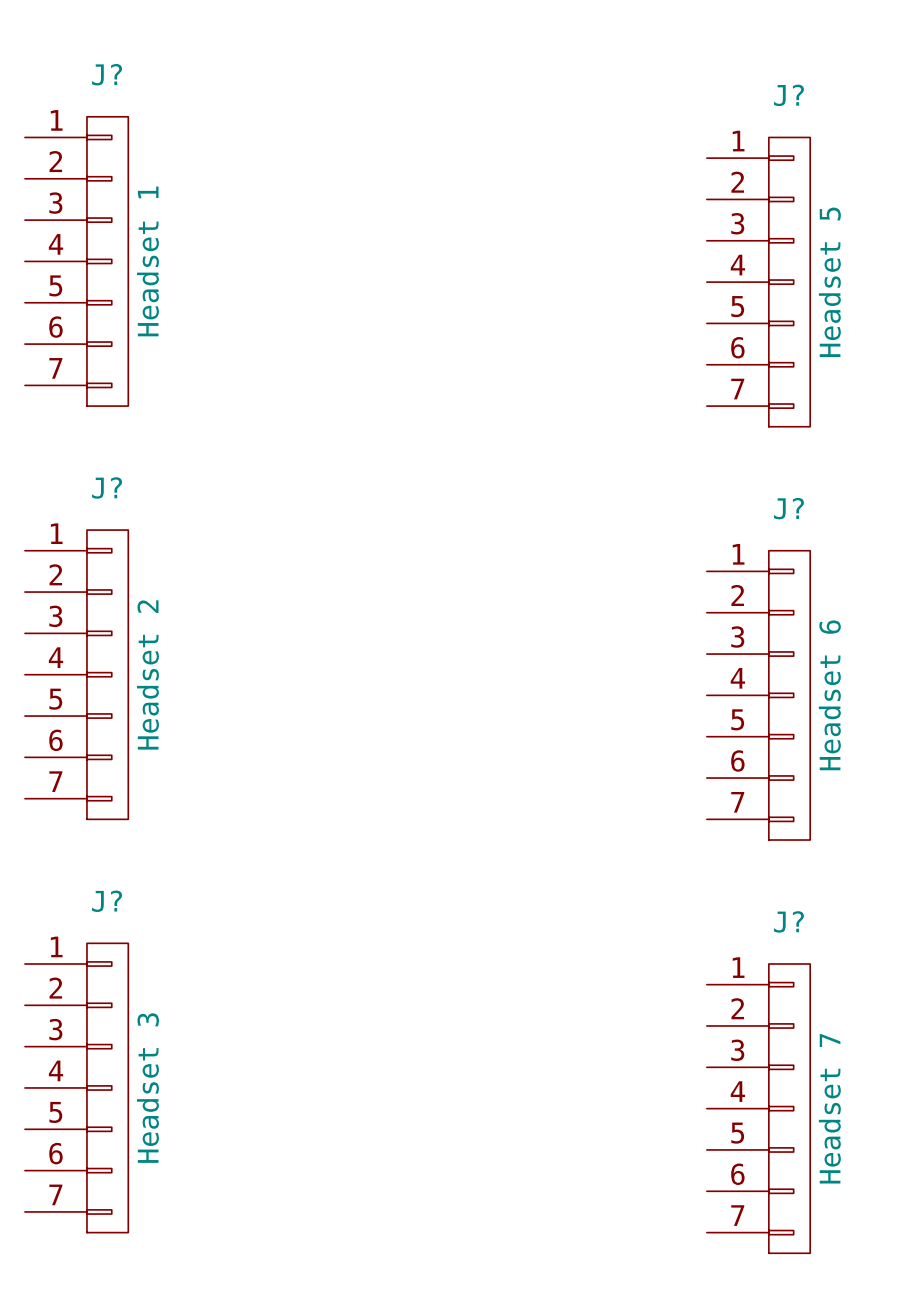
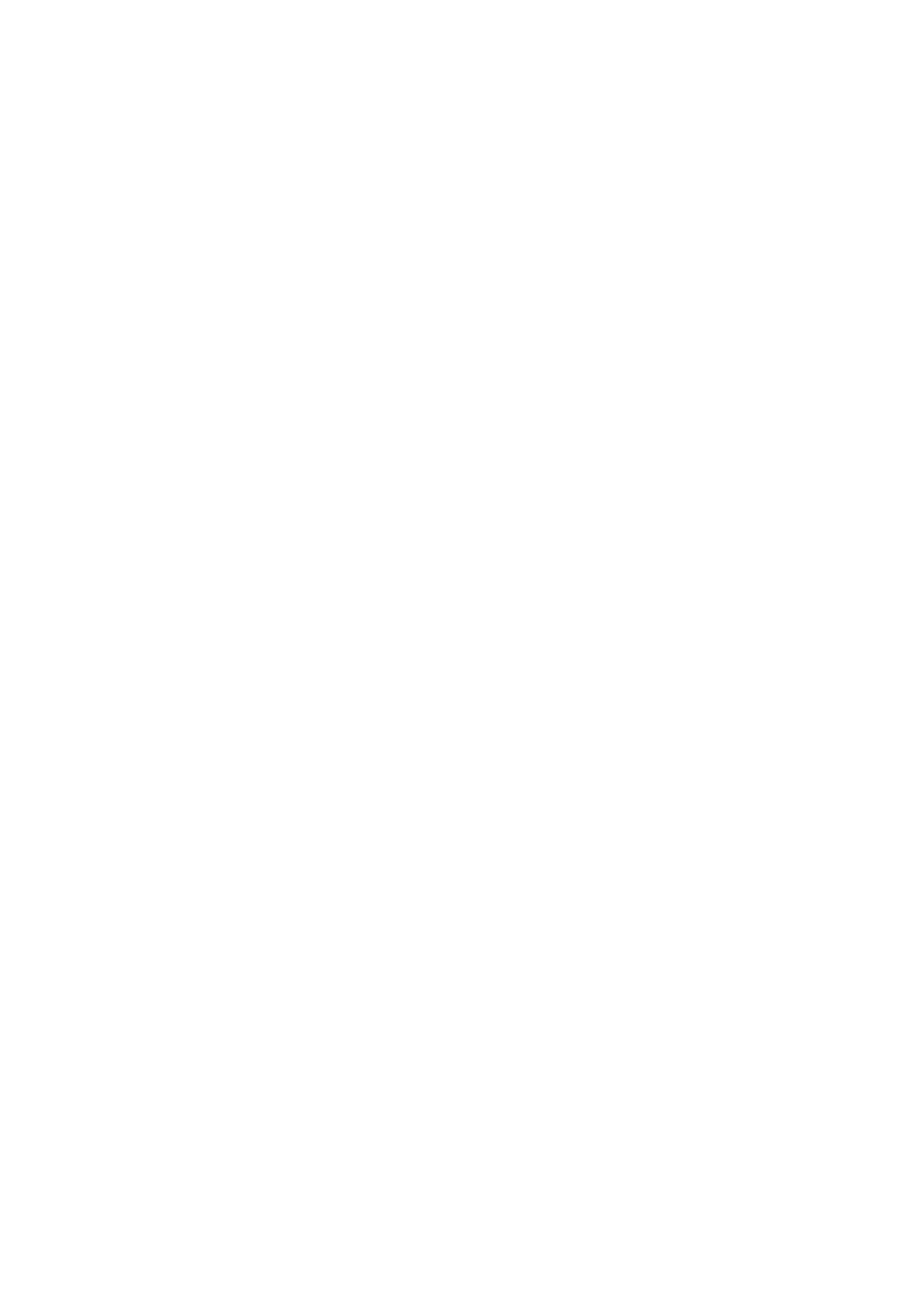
J?: Headset 1 (76, 261) -> none
J?: Headset 5 (758, 282) -> none
J?: Headset 2 (76, 674) -> none
J?: Headset 6 (758, 695) -> none
J?: Headset 3 (76, 1087) -> none
J?: Headset 7 (758, 1108) -> none

